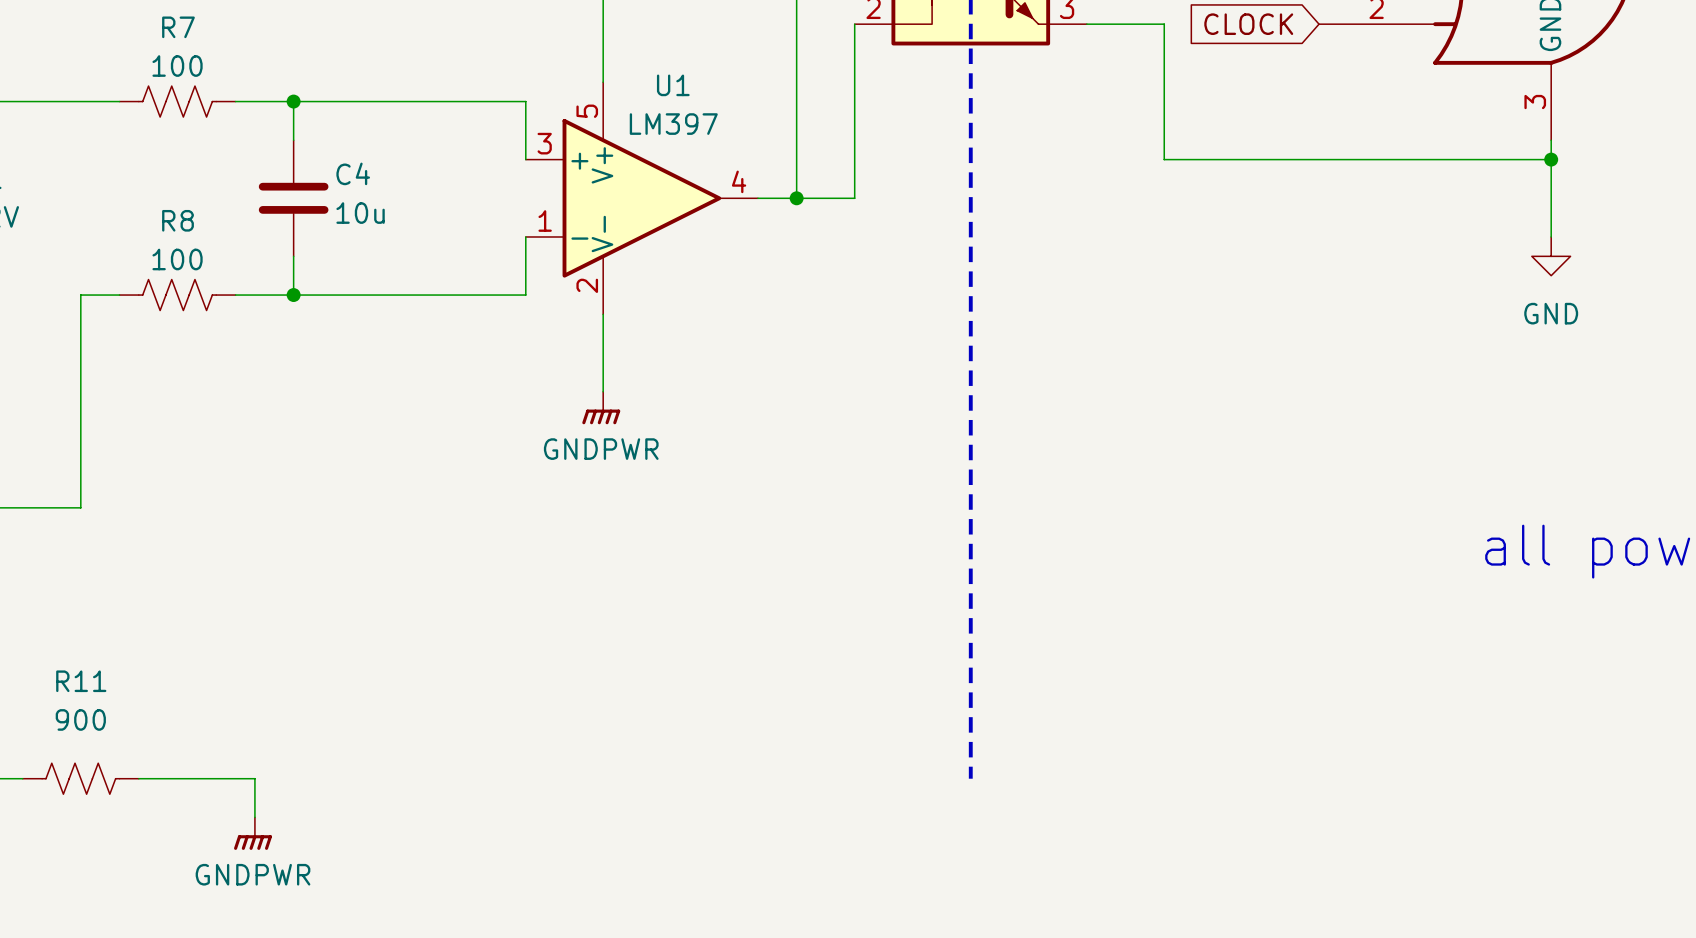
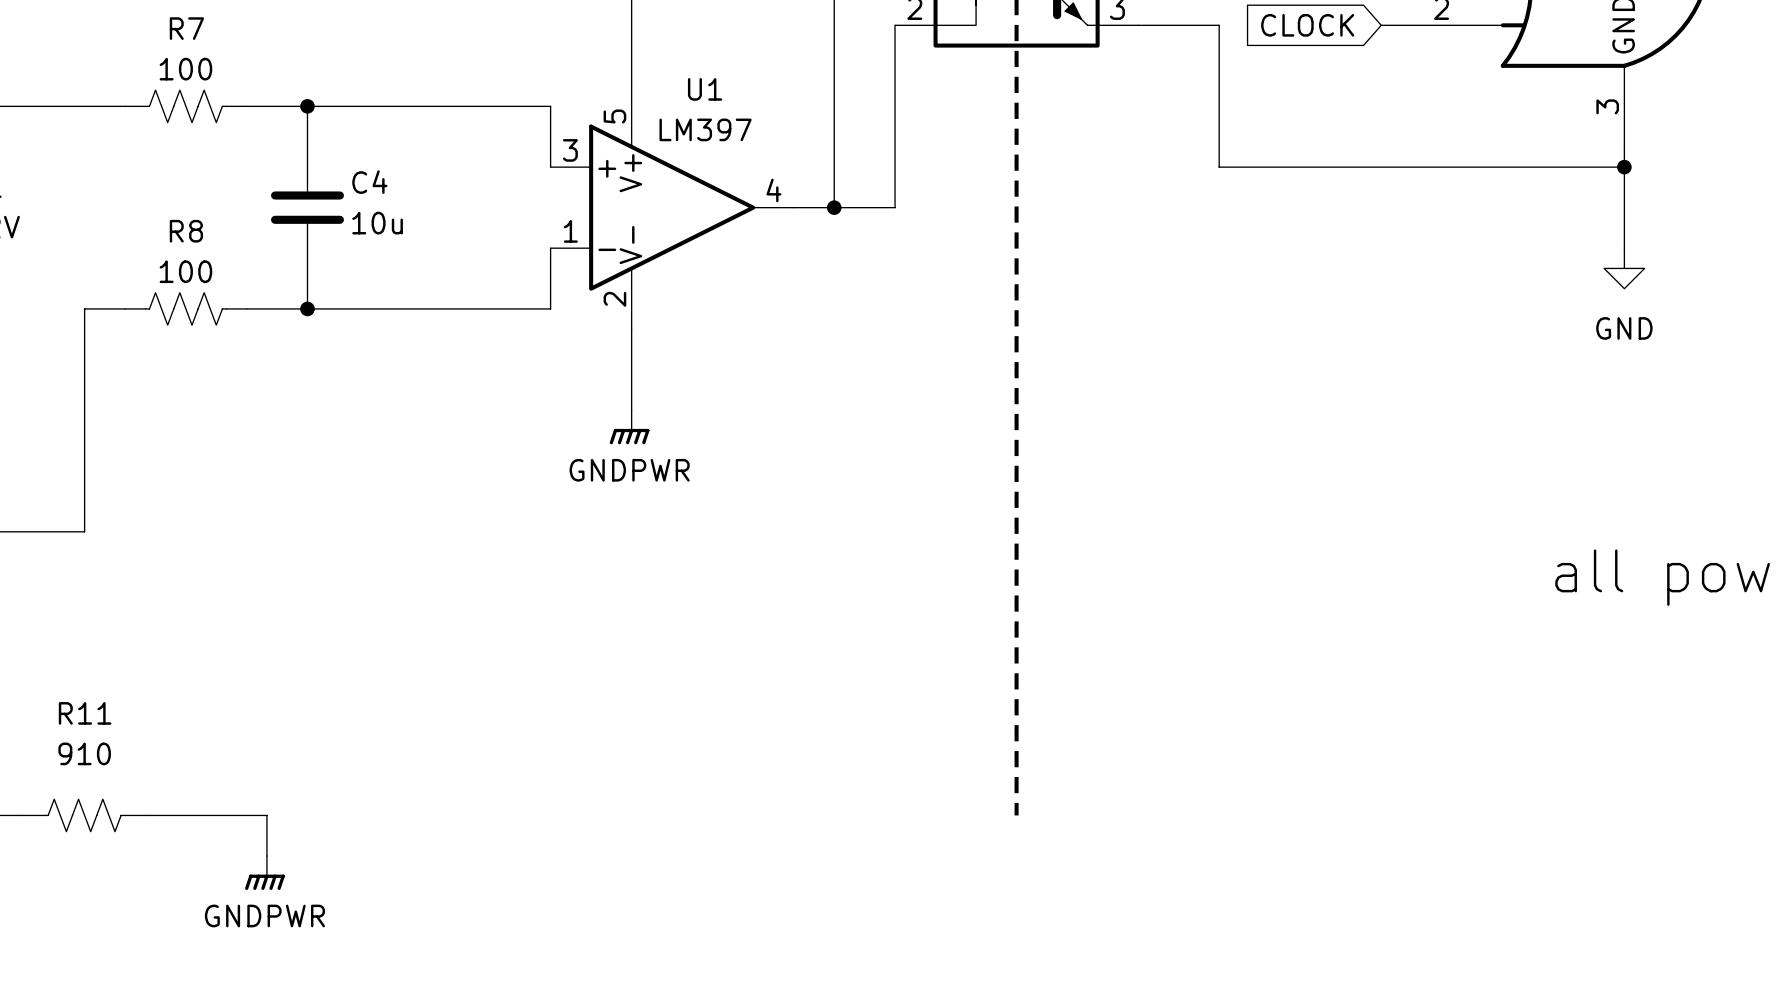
R11 value: 900 (80, 719) -> 910 (84, 753)

